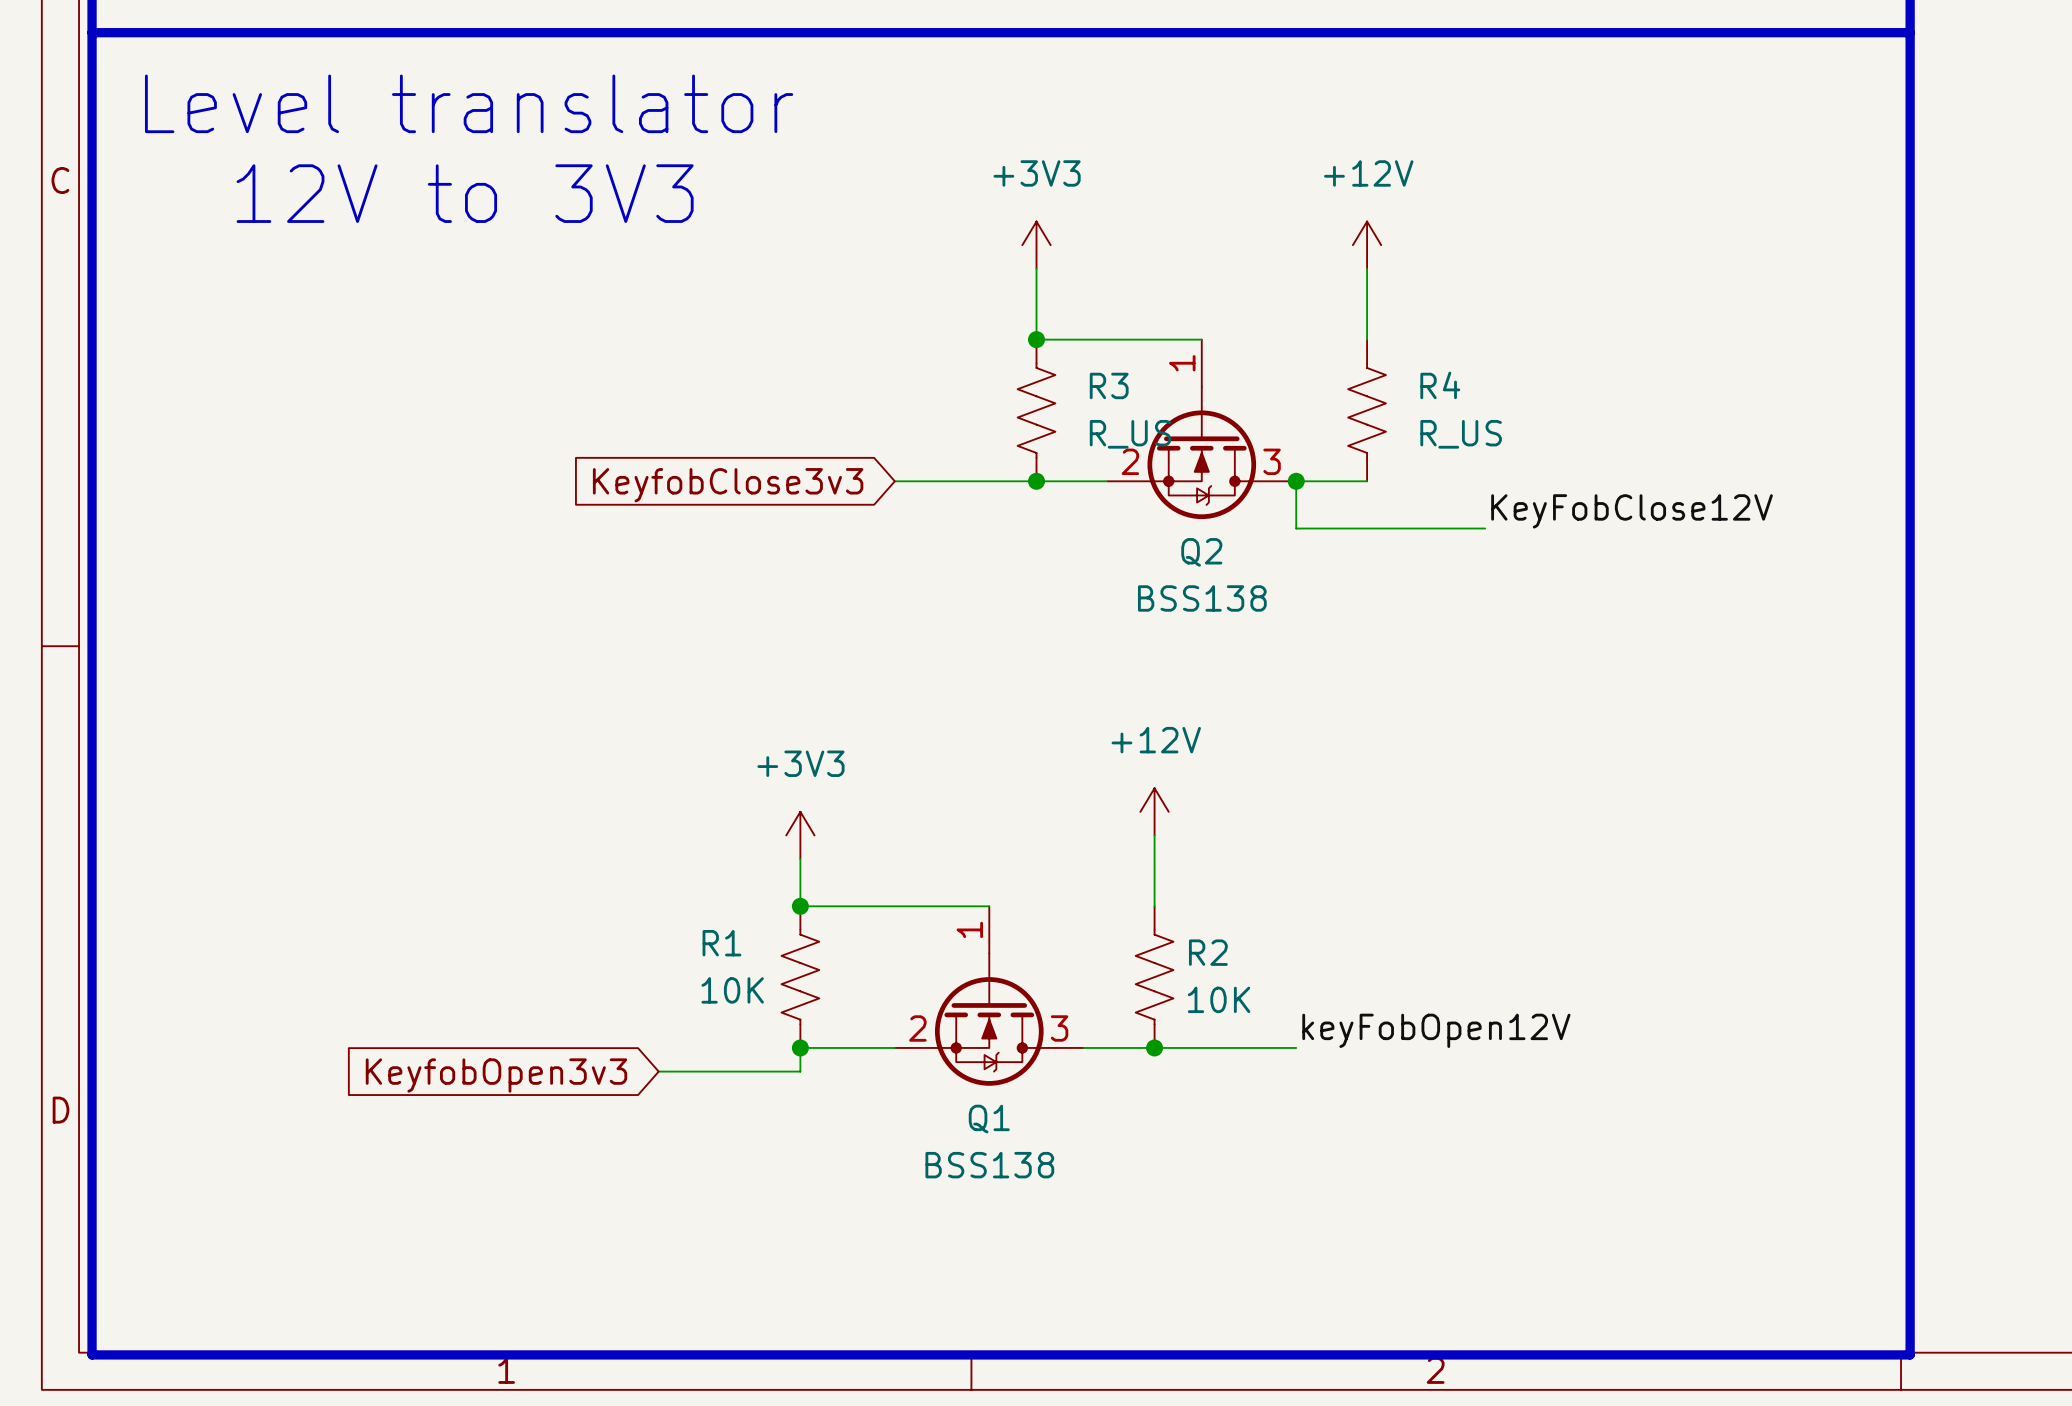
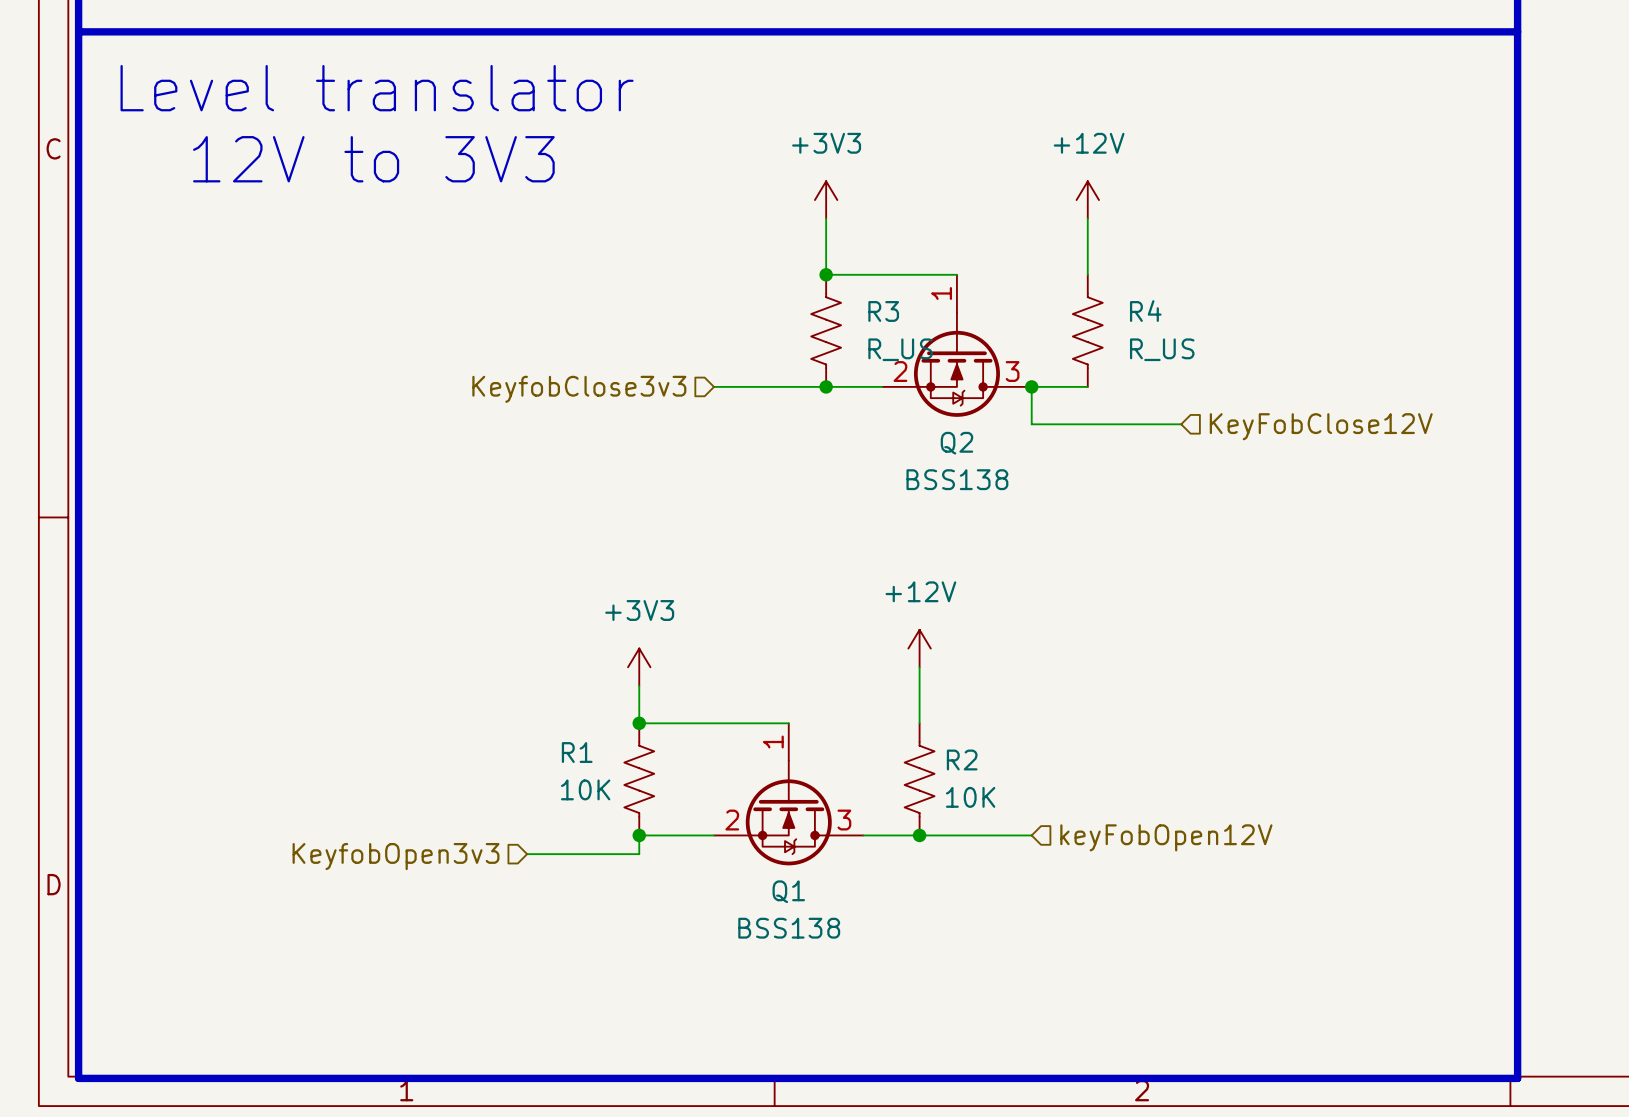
hierarchical label: none -> KeyfobClose3v3 (579, 389)
global label: KeyfobClose3v3 (728, 485) -> none
label: KeyFobClose12V (1632, 511) -> none
hierarchical label: none -> KeyFobClose12V (1321, 426)
label: keyFobOpen12V (1436, 1030) -> none
hierarchical label: none -> keyFobOpen12V (1166, 837)
hierarchical label: none -> KeyfobOpen3v3 (396, 856)
global label: KeyfobOpen3v3 (496, 1075) -> none

